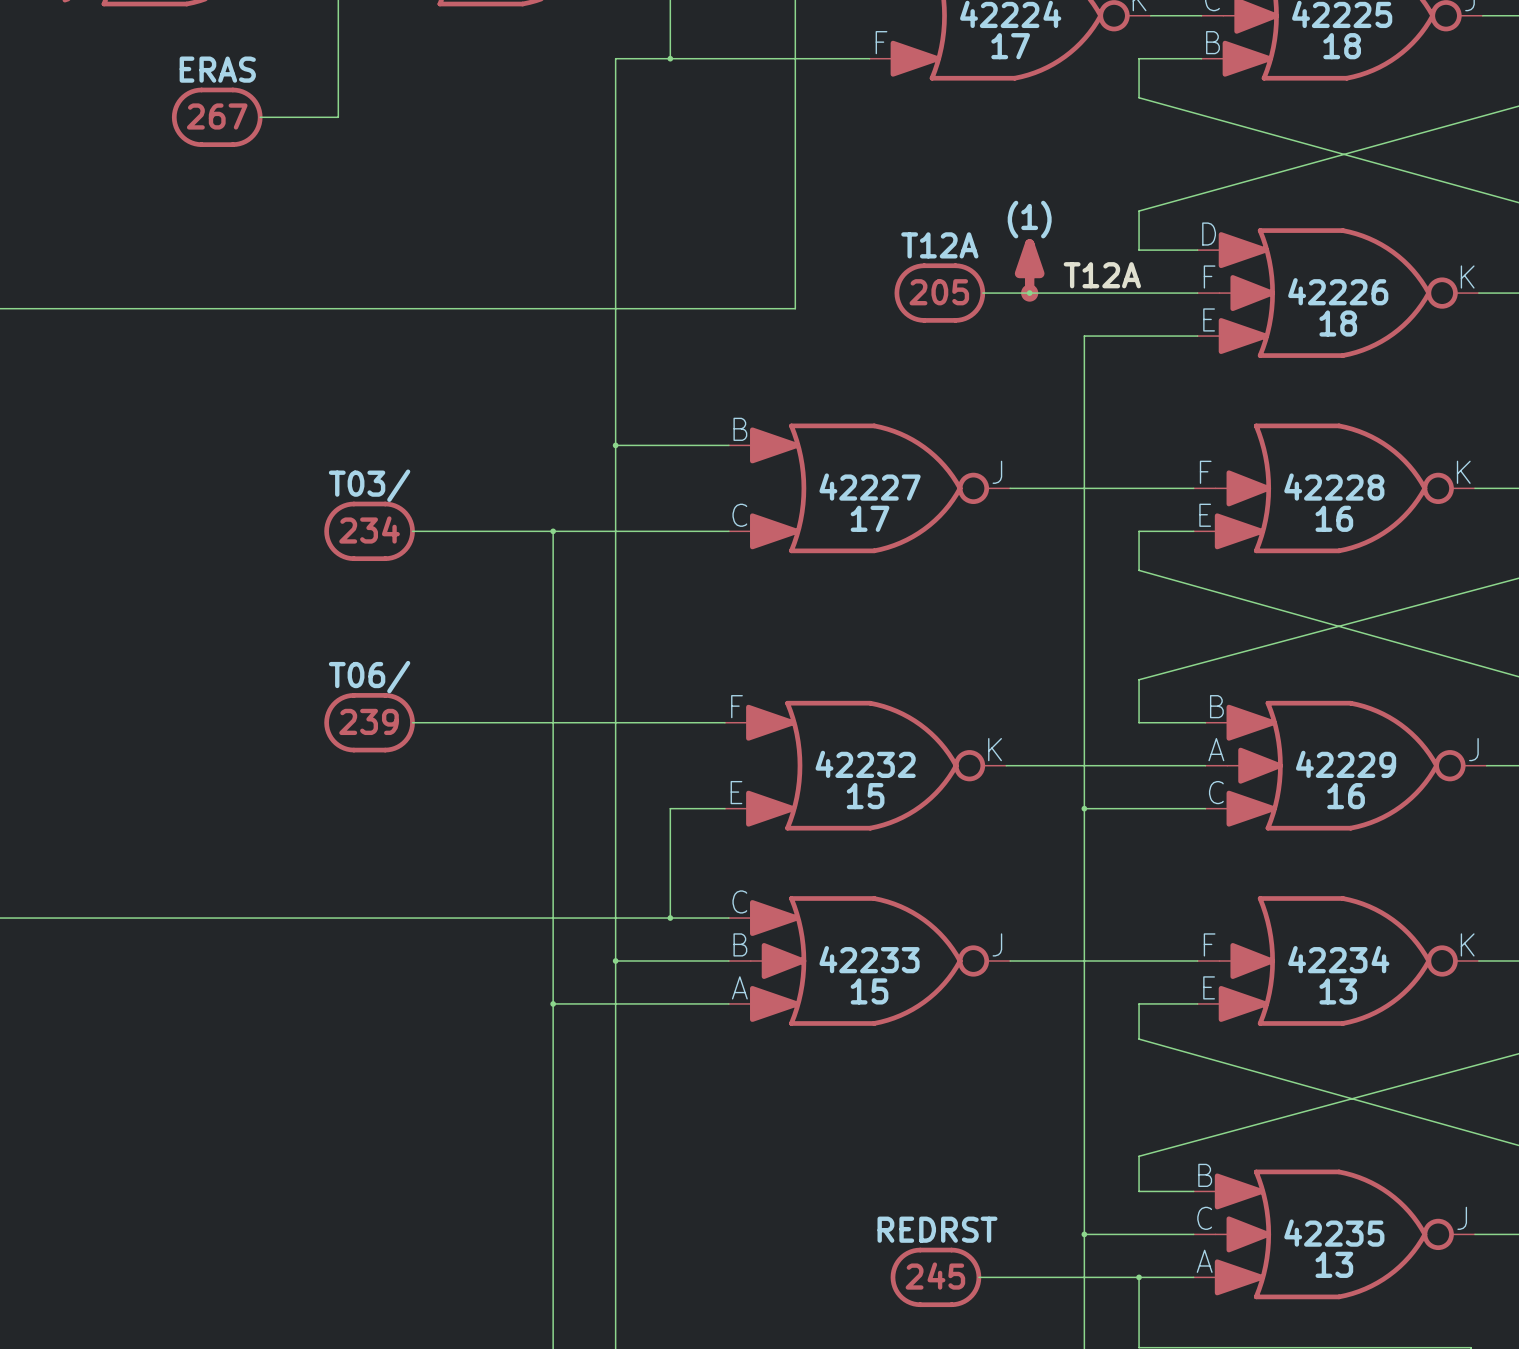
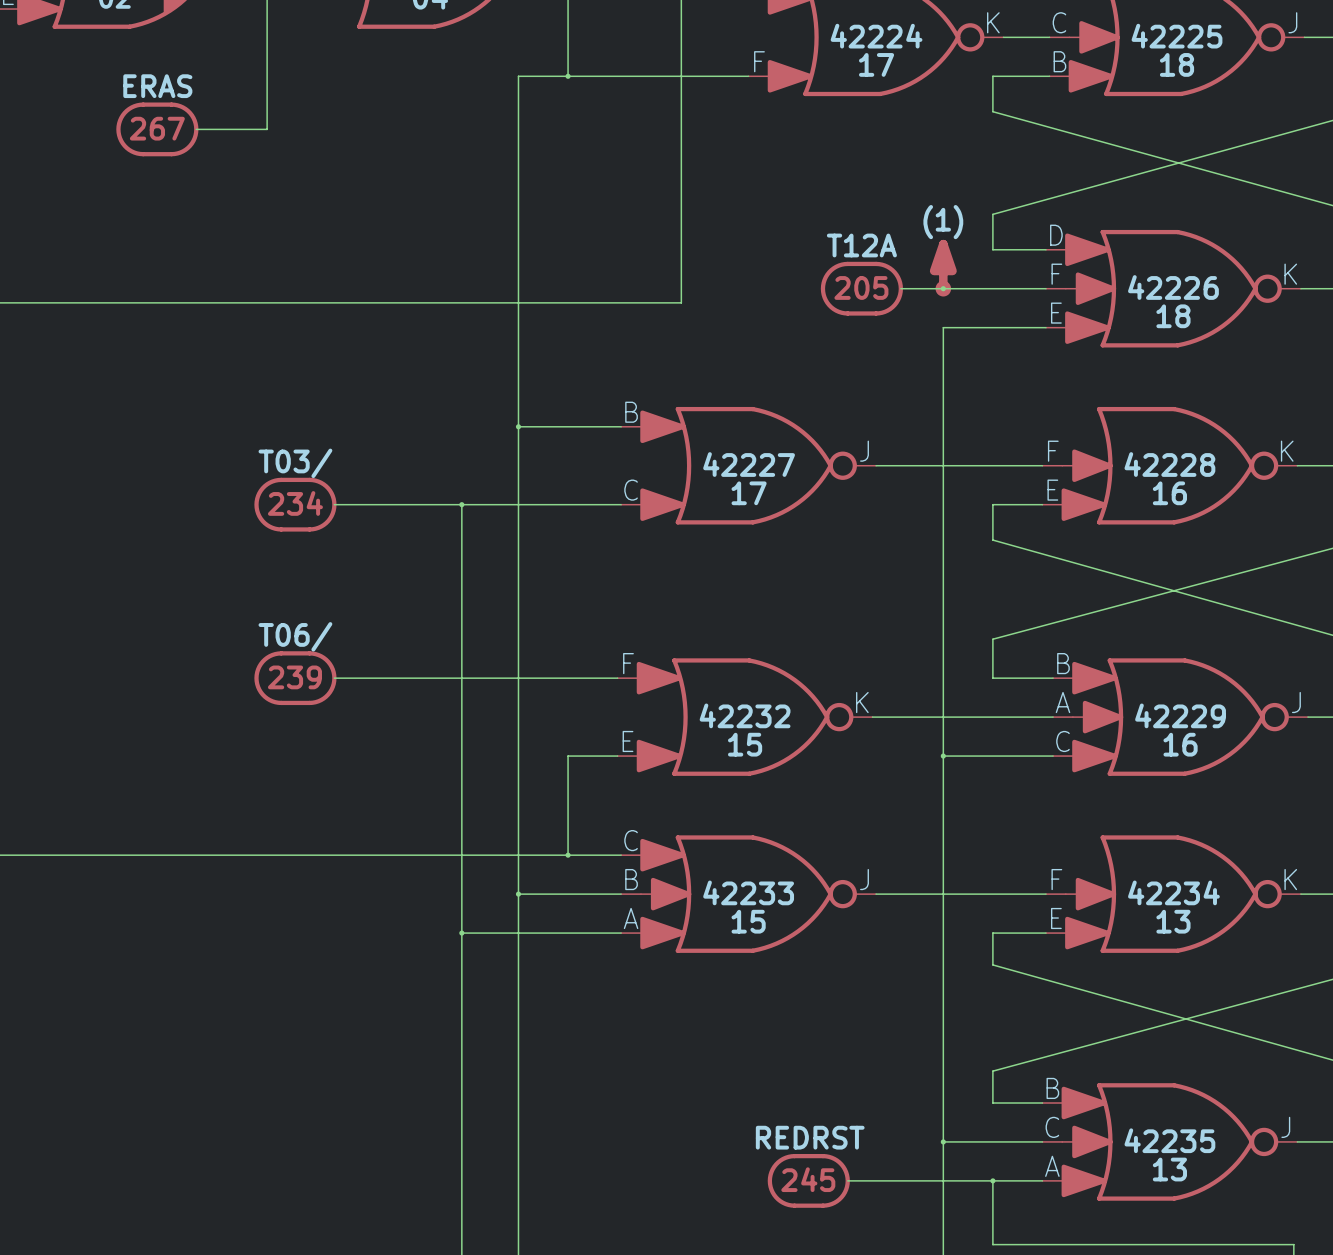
part position: (1029, 270) -> (943, 268)
label: T12A (1102, 275) -> none
part position: (939, 293) -> (861, 288)
wire: (982, 293) (1037, 293) -> none
junction: (1029, 293) -> none
junction: none -> (943, 288)

